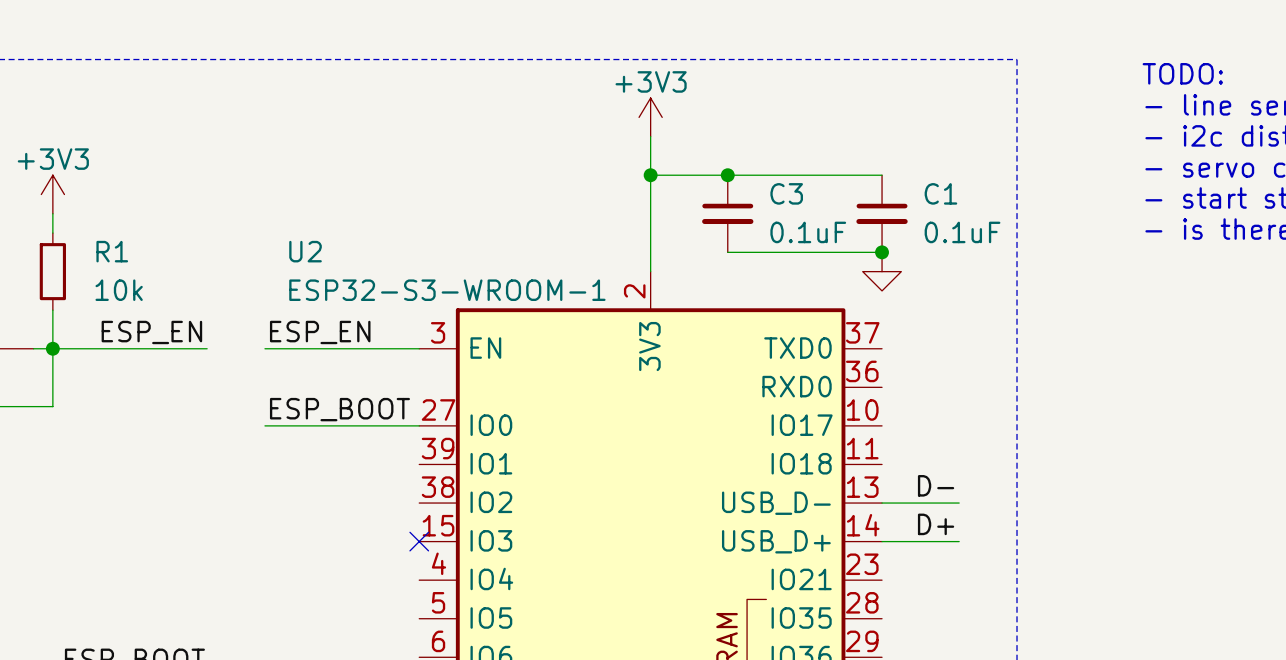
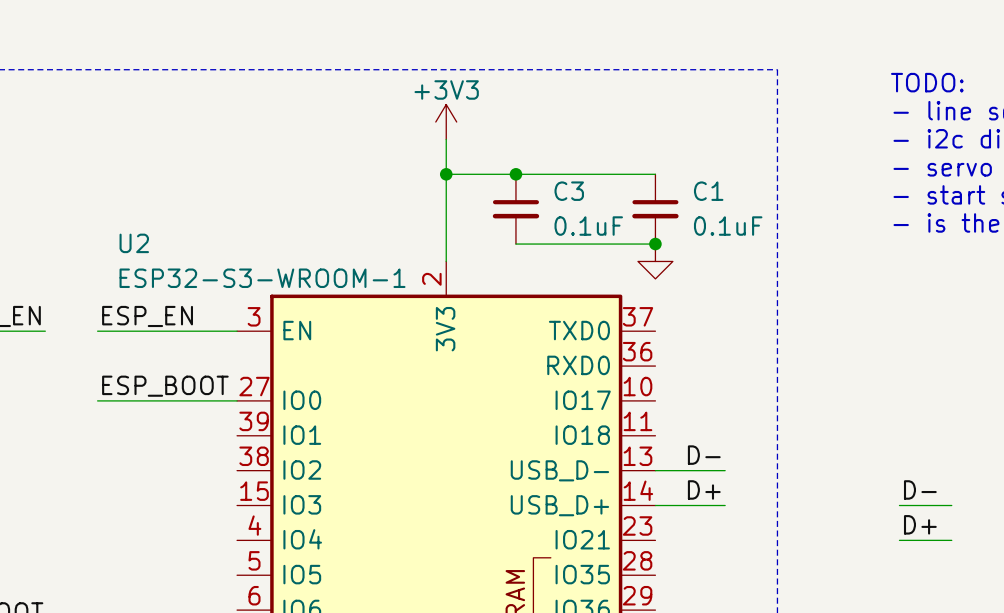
label: none -> D- (920, 489)
no-connect mark: (419, 541) -> none
wire: none -> (899, 505) (951, 505)
label: none -> D+ (920, 524)
wire: none -> (899, 540) (951, 540)

